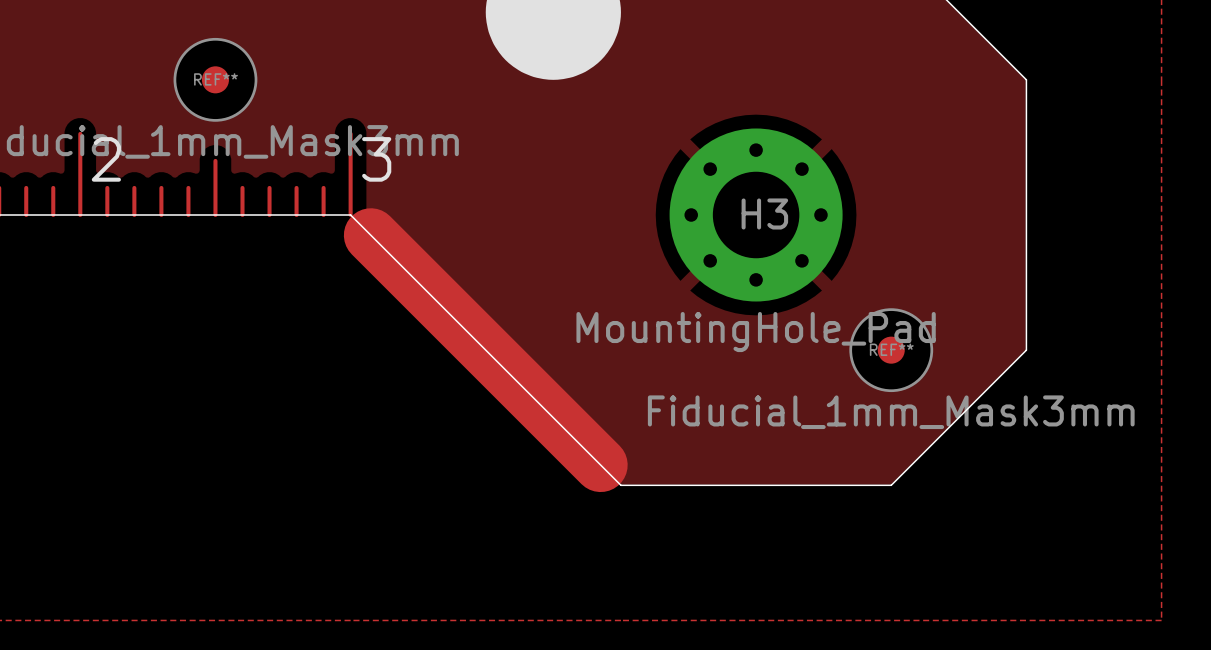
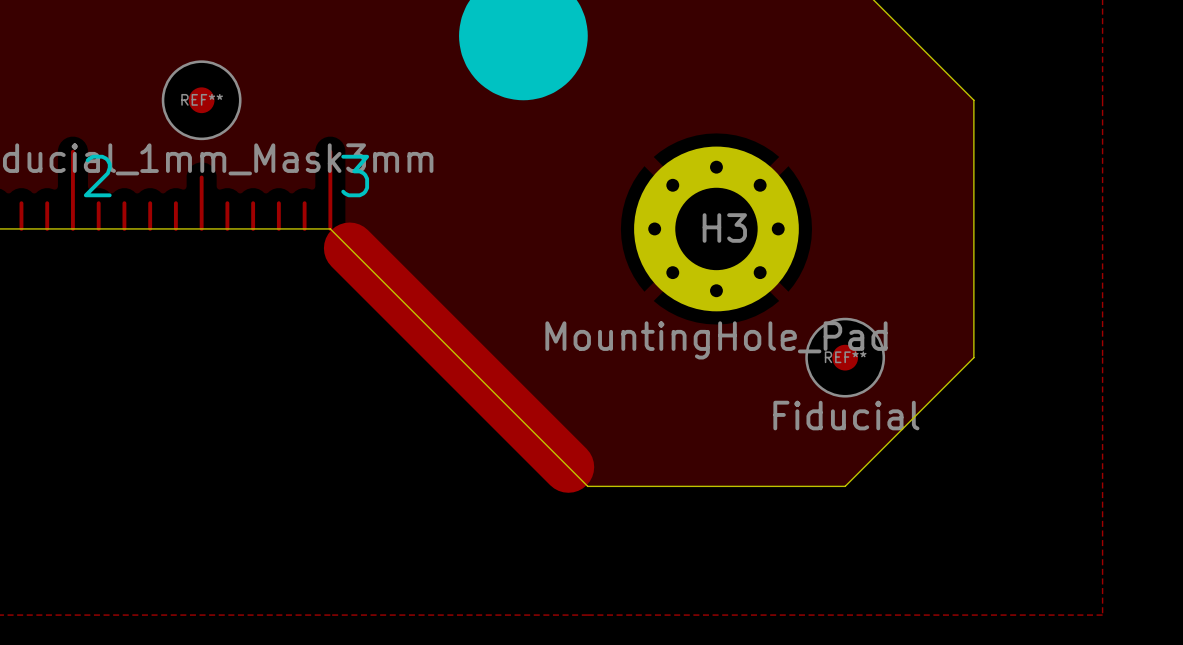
REF** value: Fiducial_1mm_Mask3mm (891, 412) -> Fiducial (846, 415)

